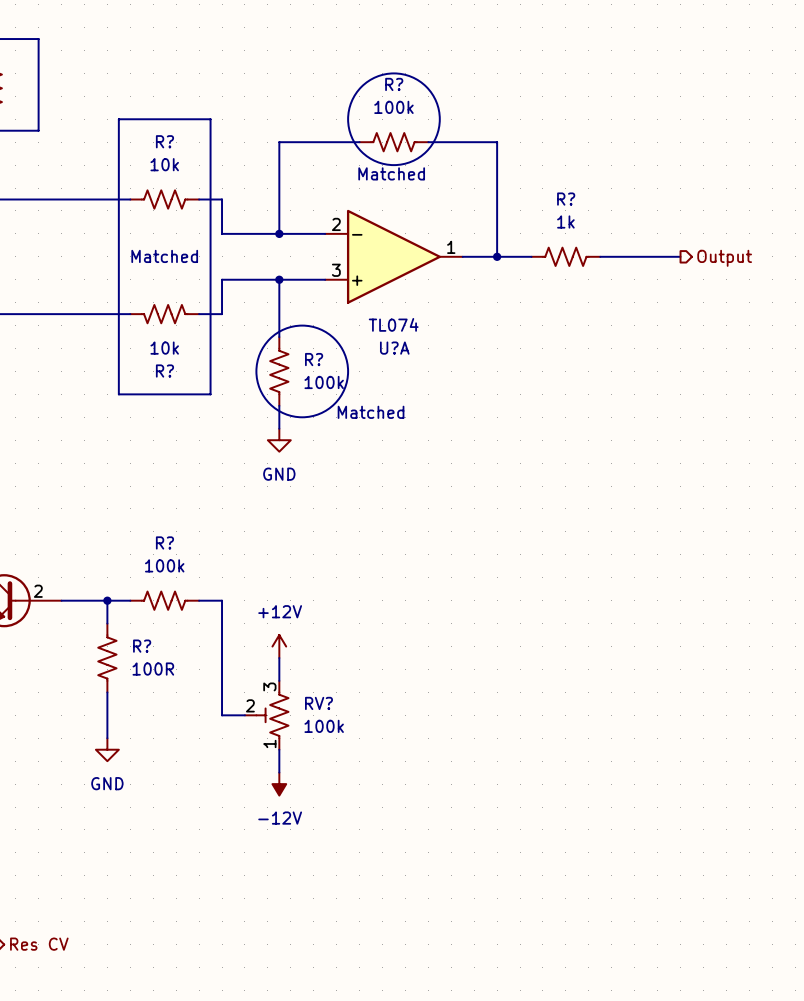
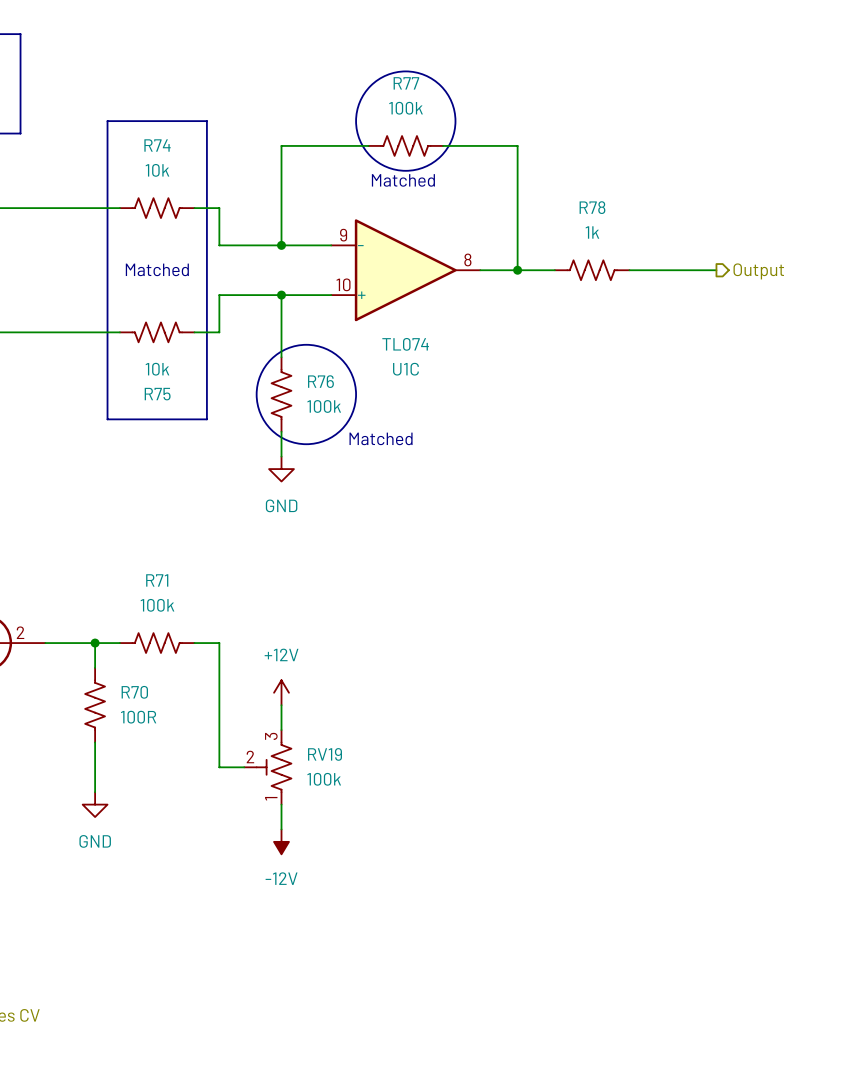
R? name: R? (394, 84) -> R77 (406, 83)
R? name: R? (164, 141) -> R74 (157, 145)
R? name: R? (566, 199) -> R78 (592, 207)
U?A pin number: 2 (336, 224) -> 9 (343, 235)
U?A pin number: 1 (451, 247) -> 8 (467, 259)
U?A pin number: 3 (336, 270) -> 10 (343, 284)
U?A name: U?A (394, 348) -> U1C (405, 369)
R? name: R? (314, 359) -> R76 (320, 381)
R? name: R? (164, 371) -> R75 (157, 394)
R? name: R? (164, 542) -> R71 (157, 580)
R? name: R? (142, 646) -> R70 (134, 692)
RV? name: RV? (318, 703) -> RV19 (325, 754)

